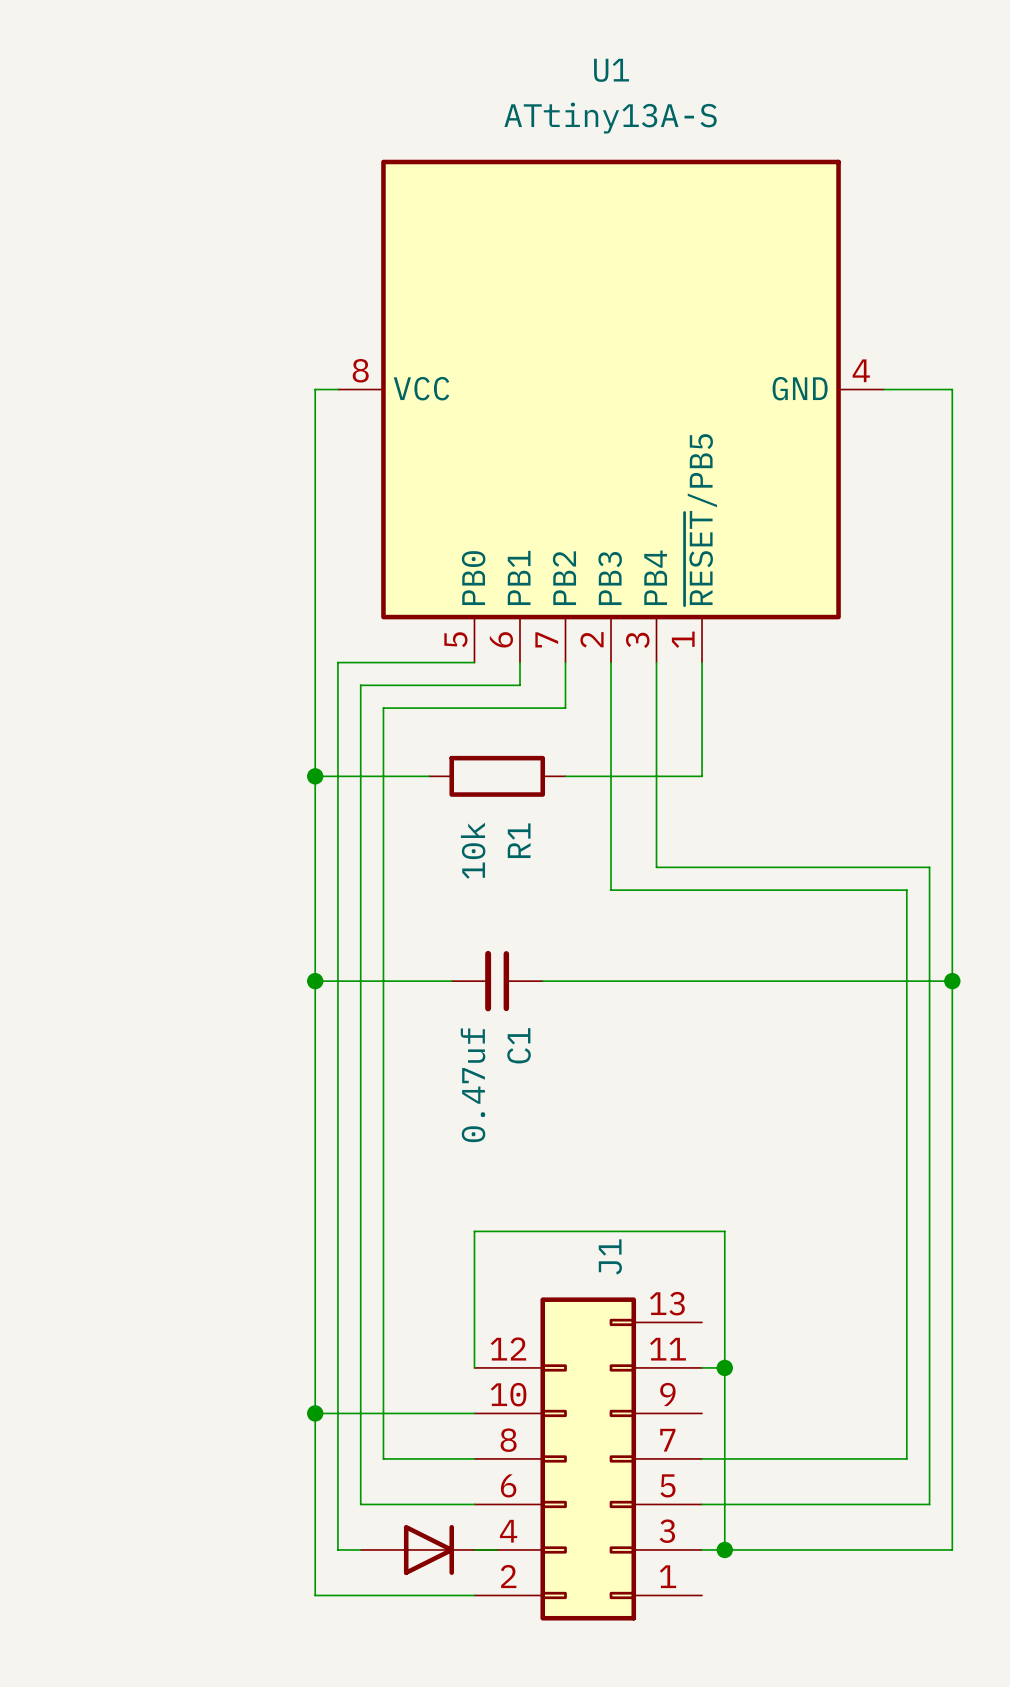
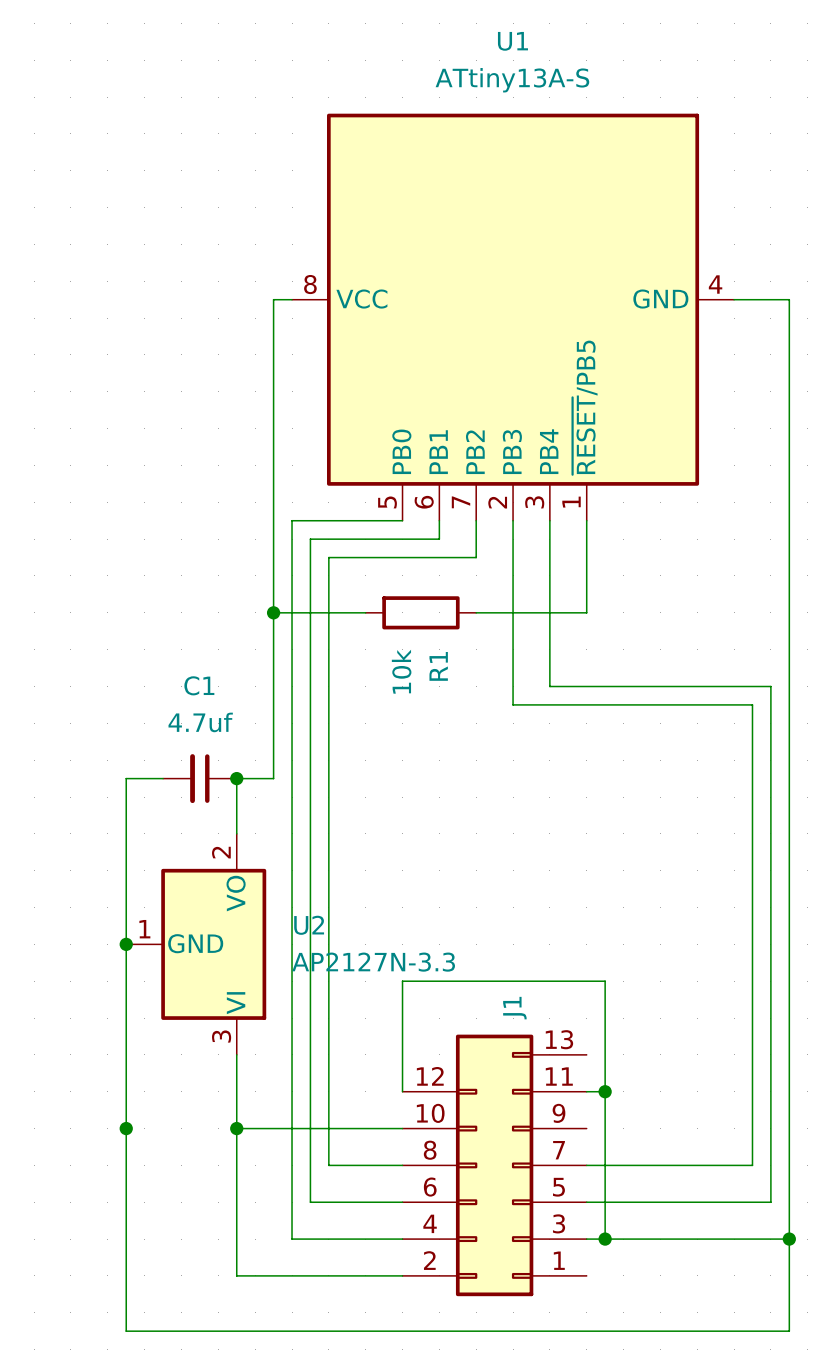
wire: none -> (163, 778) (126, 778) (126, 1331) (789, 1331) (789, 1239)
wire: none -> (273, 778) (236, 778) (236, 833)
junction position: (315, 981) -> (236, 778)
wire: (451, 981) (315, 981) (315, 1595) -> (236, 1054) (236, 1275) (273, 1275)
C1 position: (497, 981) -> (199, 778)
wire: (542, 981) (952, 981) -> none
junction: (952, 981) -> none
C1 name rotation: 0° (519, 1045) -> 90° clockwise (199, 685)
C1 name position: C1 (519, 1045) -> C1 (199, 685)
C1 value: 0.47uf (473, 1085) -> 4.7uf (200, 722)
junction: none -> (126, 944)
U2: none -> AP2127N-3.3 (196, 944)
junction: none -> (126, 1128)
wire: none -> (236, 1128) (273, 1128)
junction position: (315, 1413) -> (236, 1128)
part: (428, 1549) -> none
junction: none -> (789, 1239)

